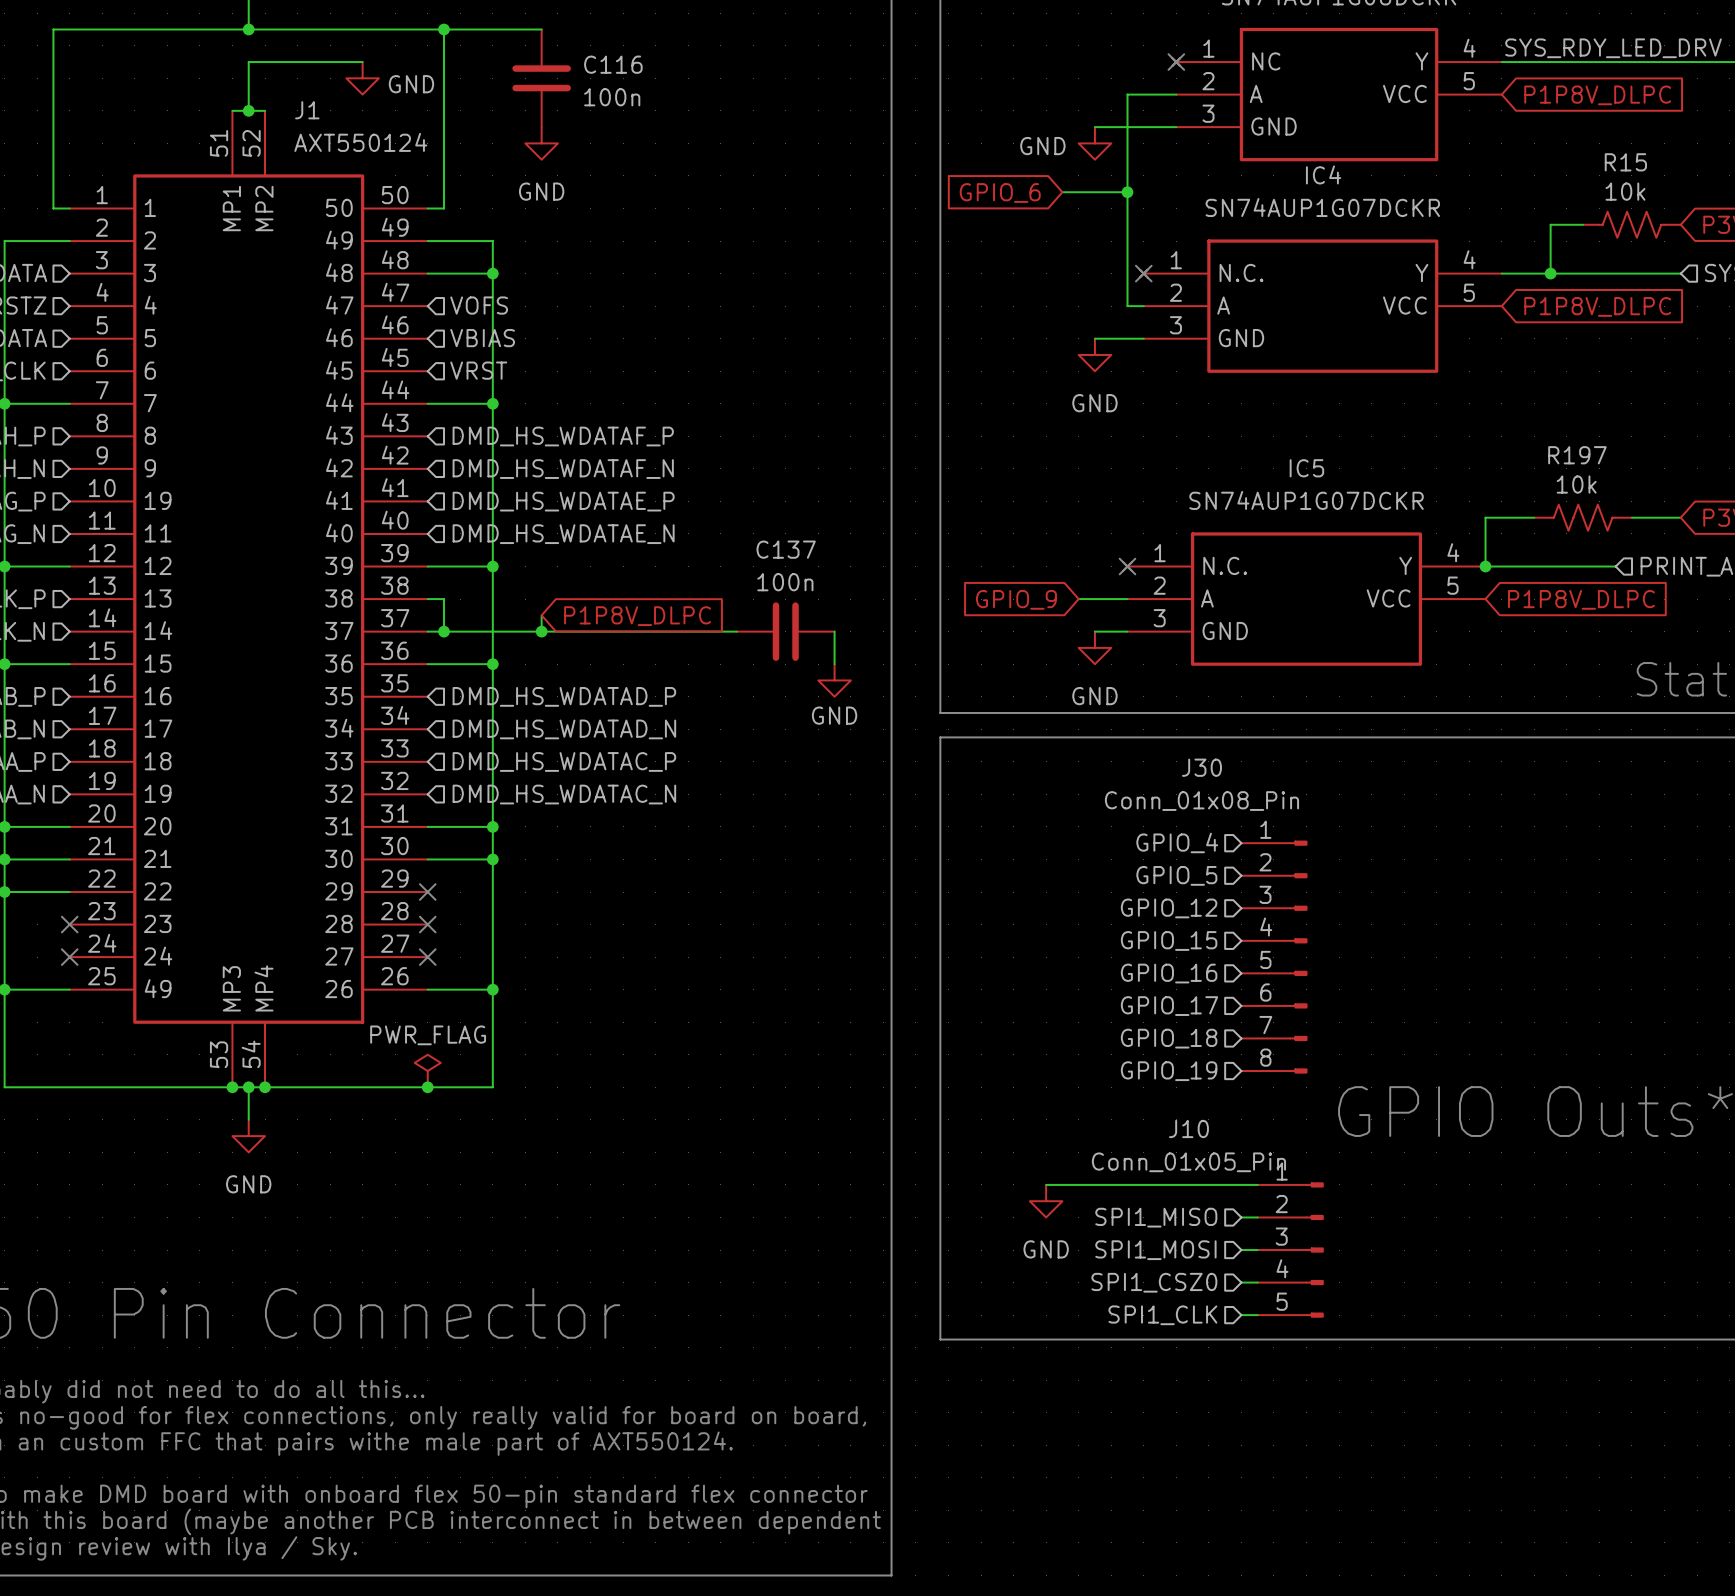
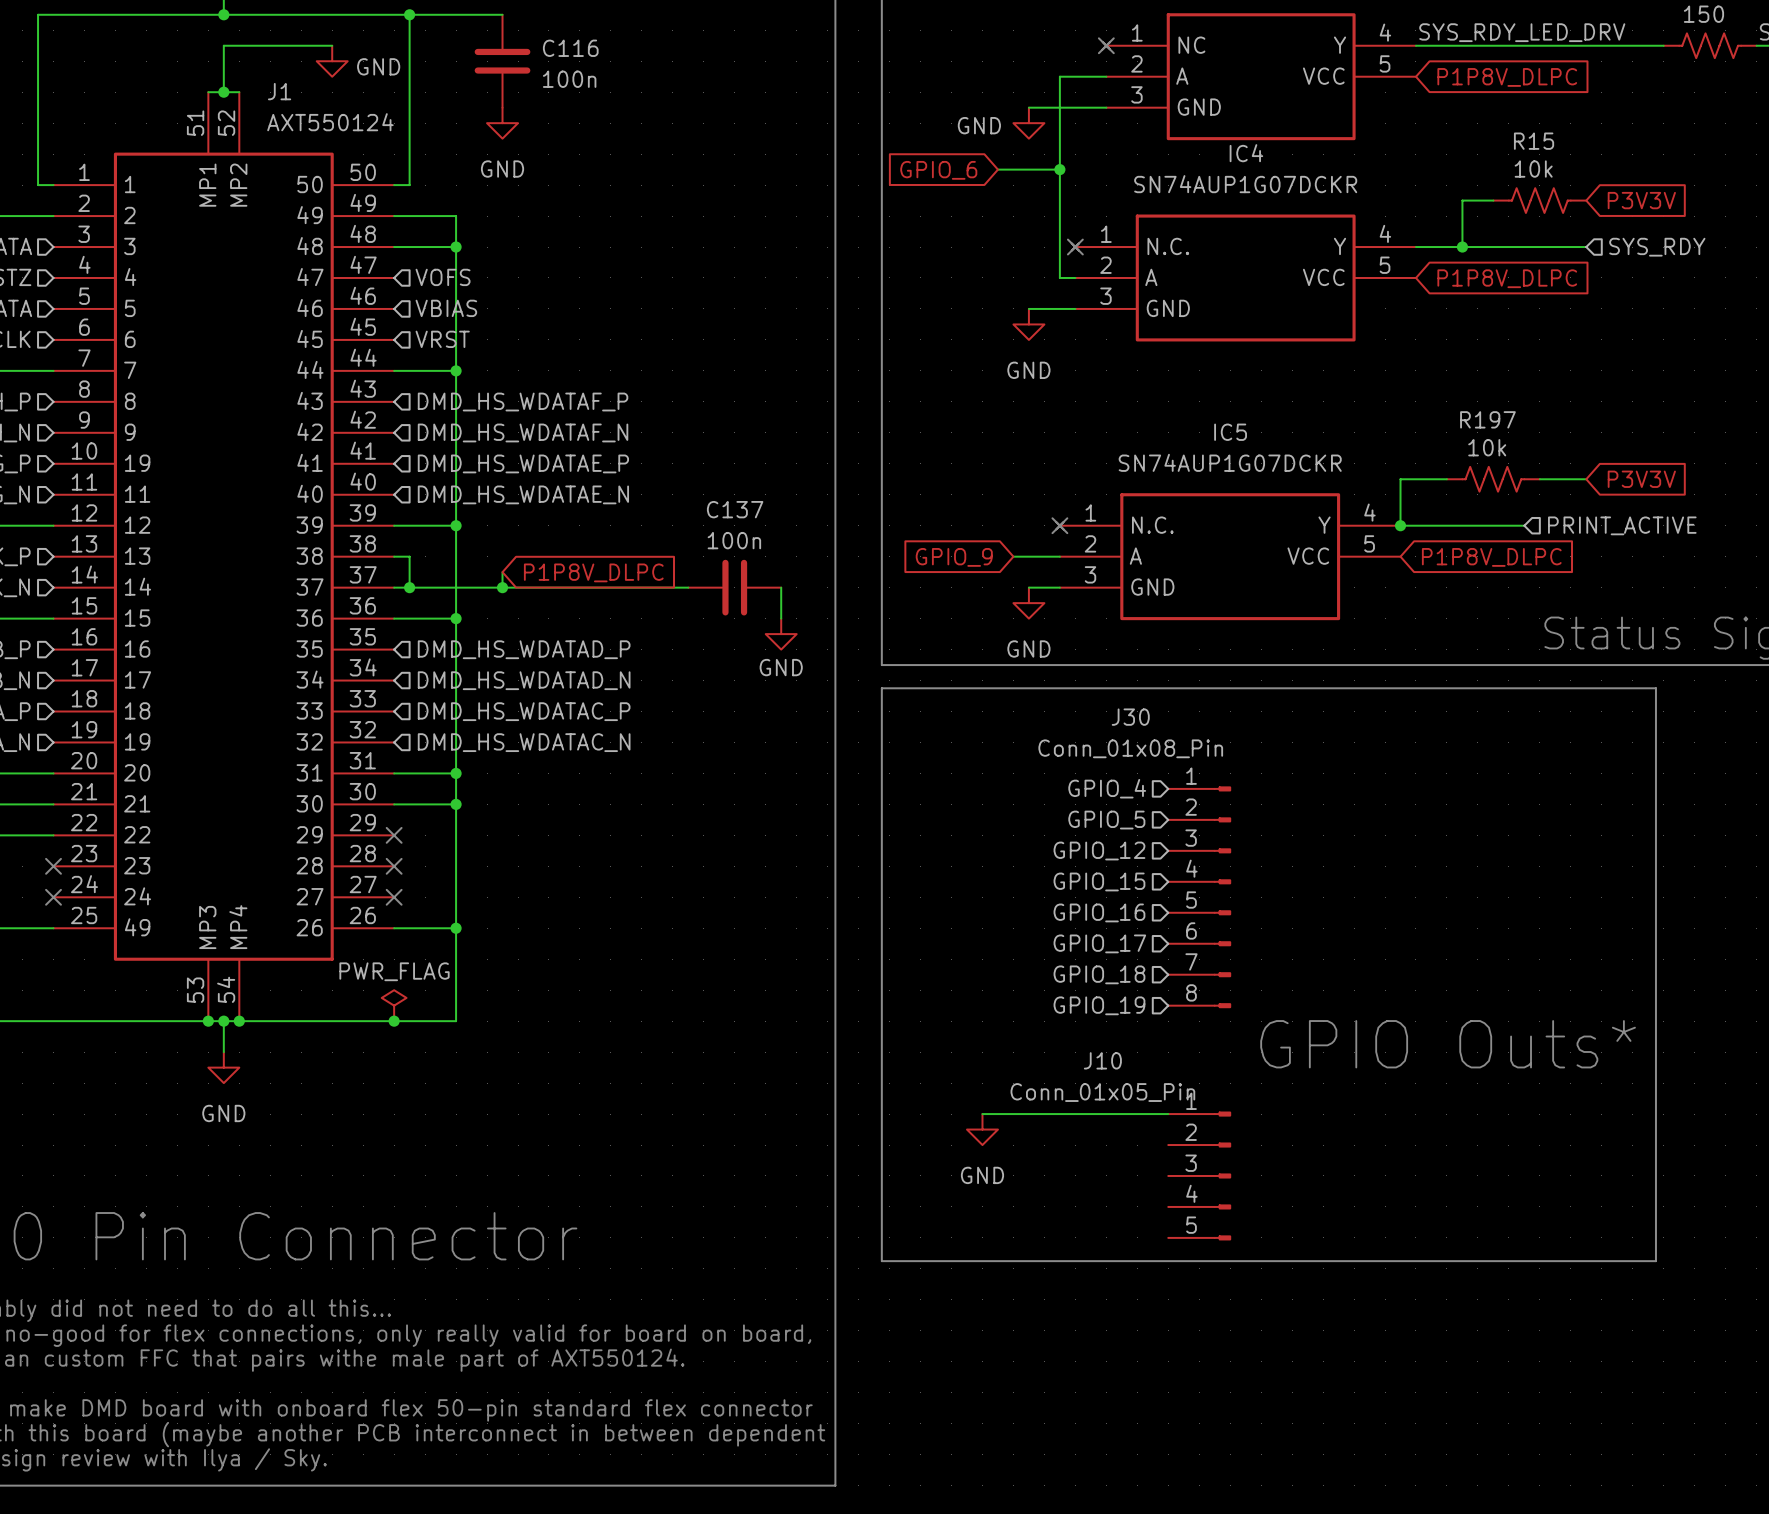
hierarchical label: SPI1_MISO (1156, 1217) -> none
hierarchical label: SPI1_MOSI (1155, 1250) -> none
J10 position: (1290, 1250) -> (1199, 1175)
hierarchical label: SPI1_CSZ0 (1154, 1282) -> none
hierarchical label: SPI1_CLK (1162, 1315) -> none

